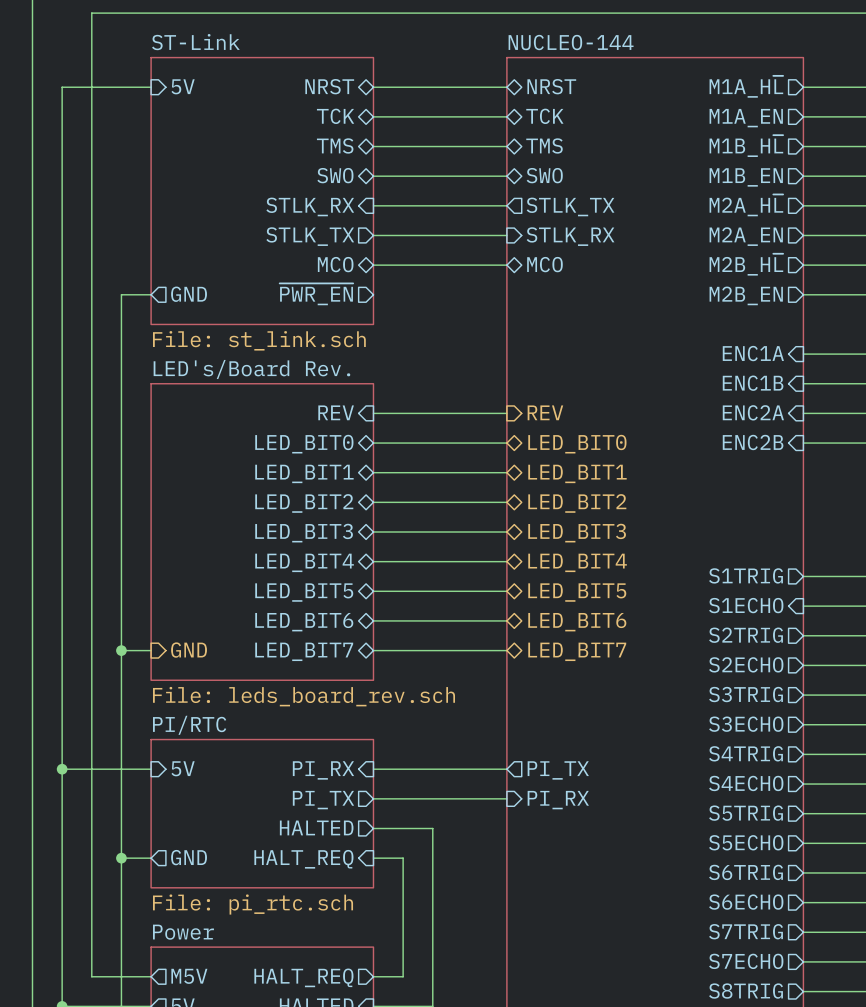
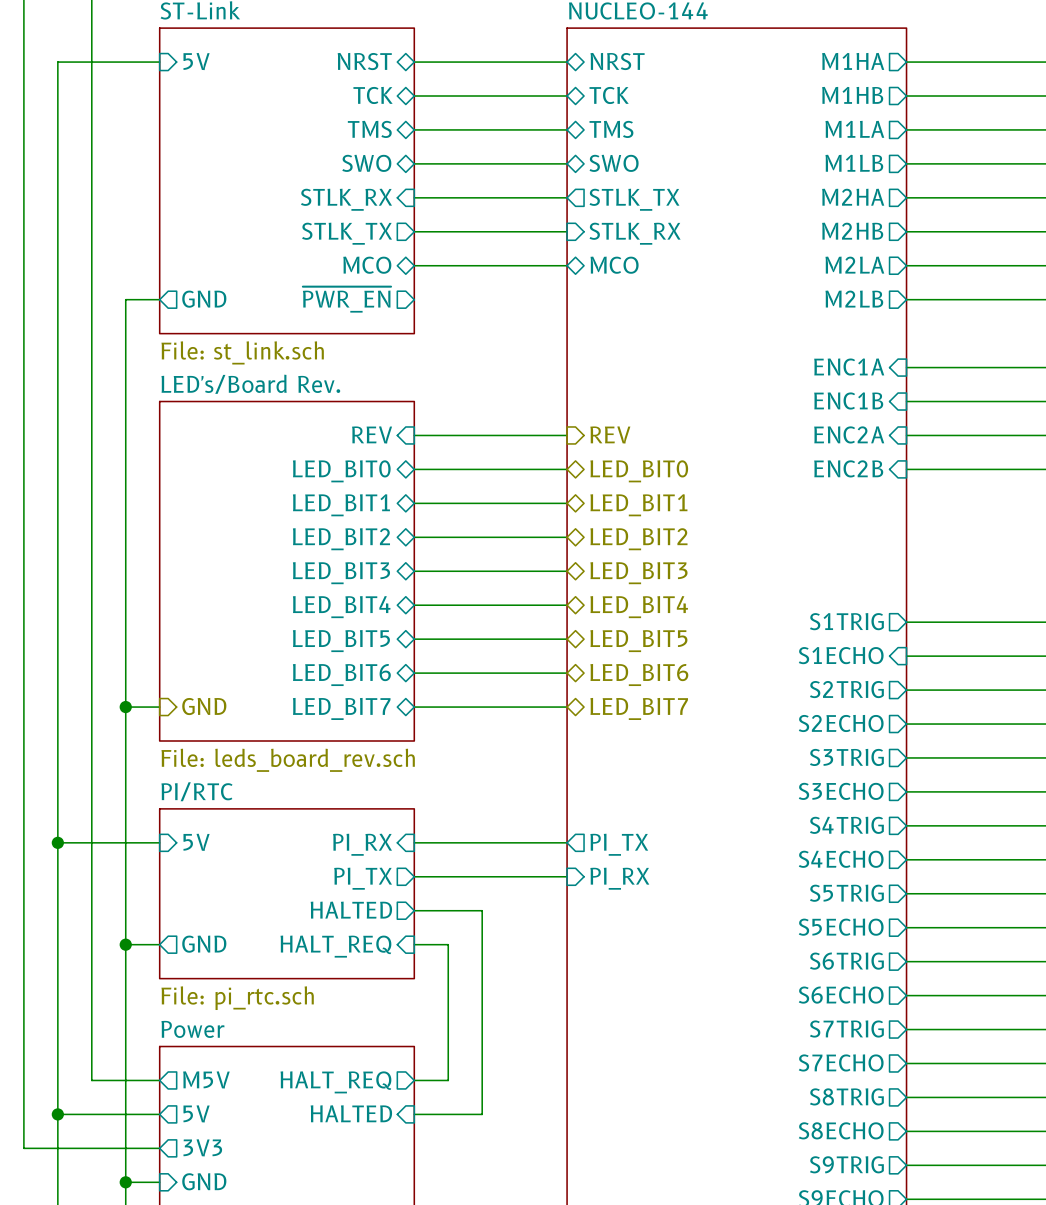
sheet pin: M1A_H~{L} (746, 86) -> M1HA (853, 61)
sheet pin: M1A_EN (746, 118) -> M1HB (852, 95)
sheet pin: M1B_H~{L} (746, 146) -> M1LA (854, 129)
sheet pin: M1B_EN (746, 177) -> M1LB (854, 163)
sheet pin: M2A_H~{L} (746, 205) -> M2HA (853, 197)
sheet pin: M2A_EN (746, 236) -> M2HB (852, 231)
sheet pin: M2B_H~{L} (746, 264) -> M2LA (854, 265)
sheet pin: M2B_EN (746, 295) -> M2LB (854, 299)

